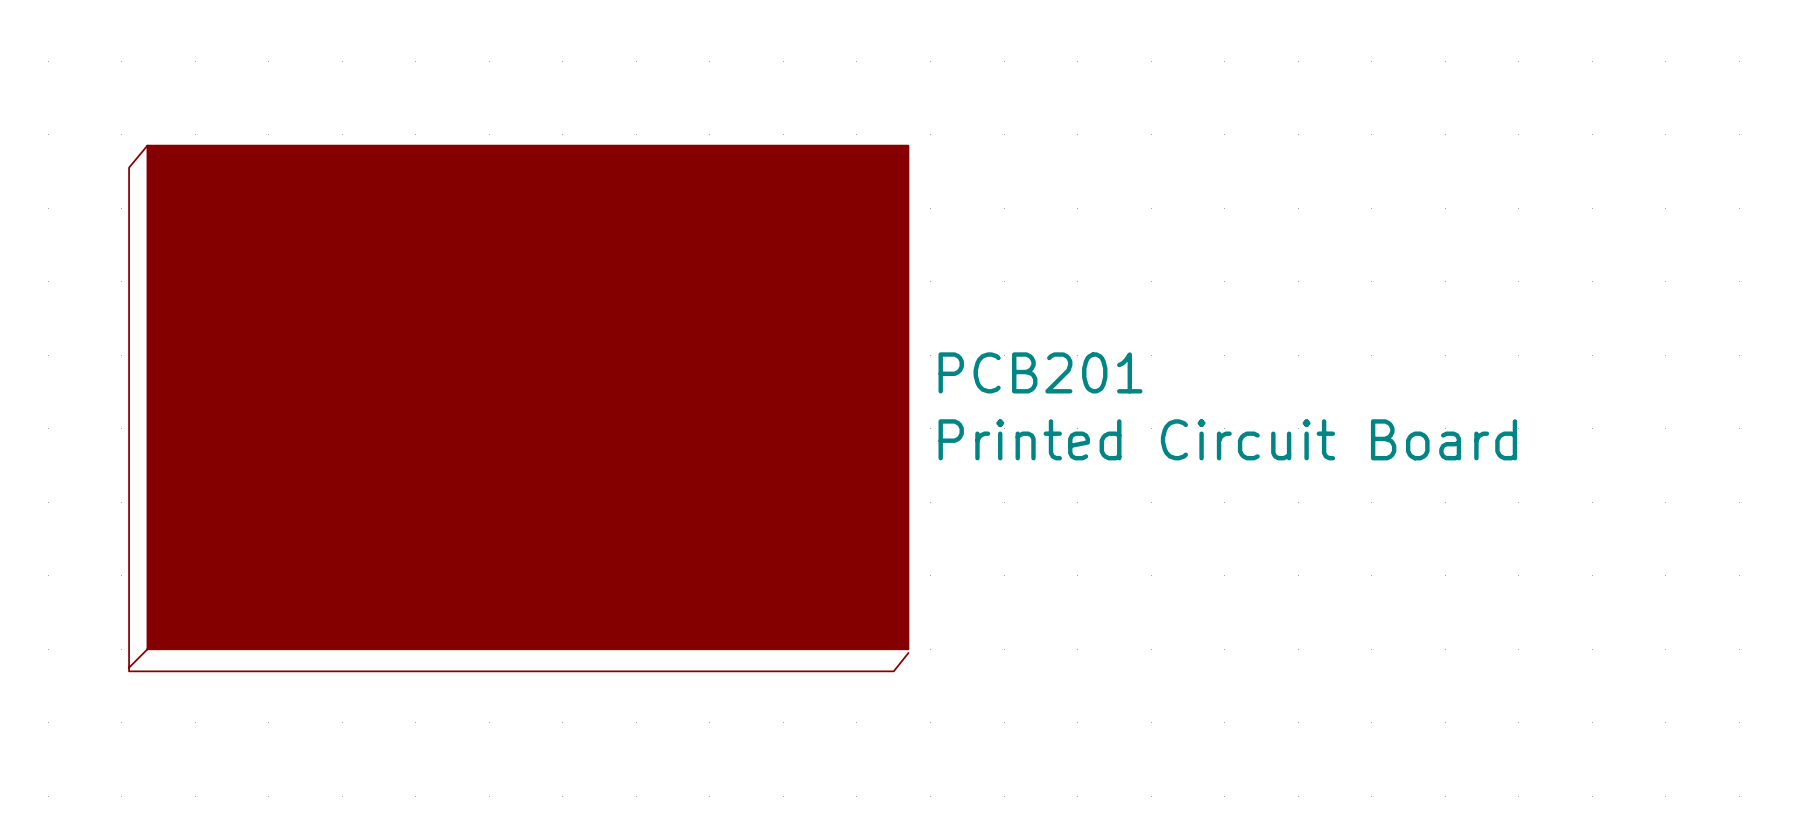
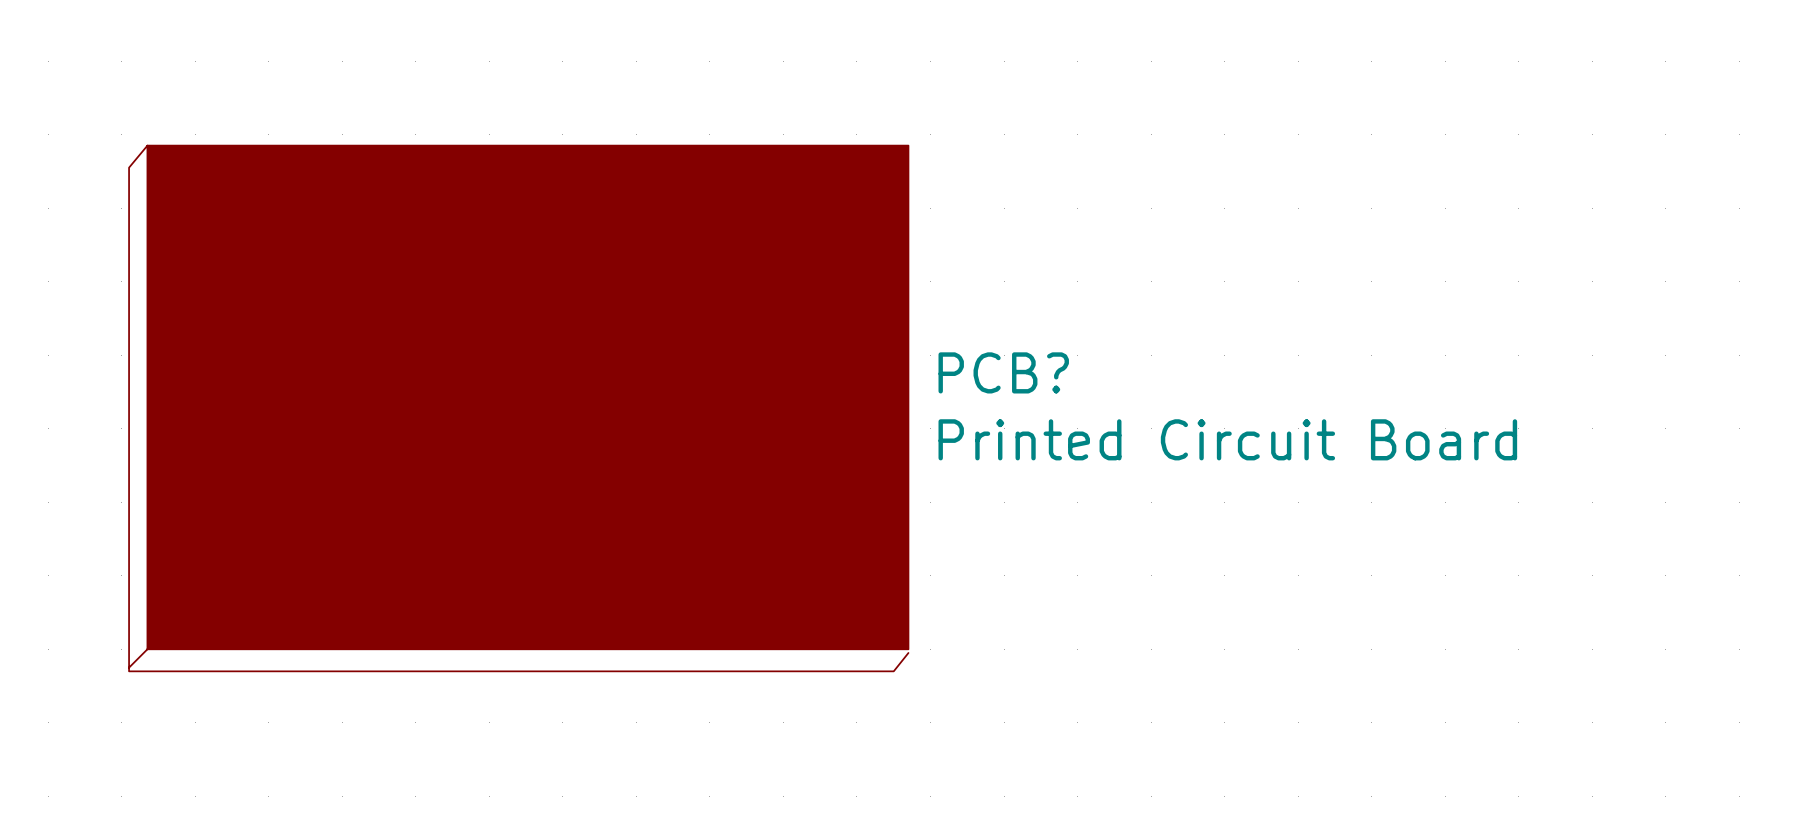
PCB201 name: PCB201 (1040, 372) -> PCB? (1003, 372)

